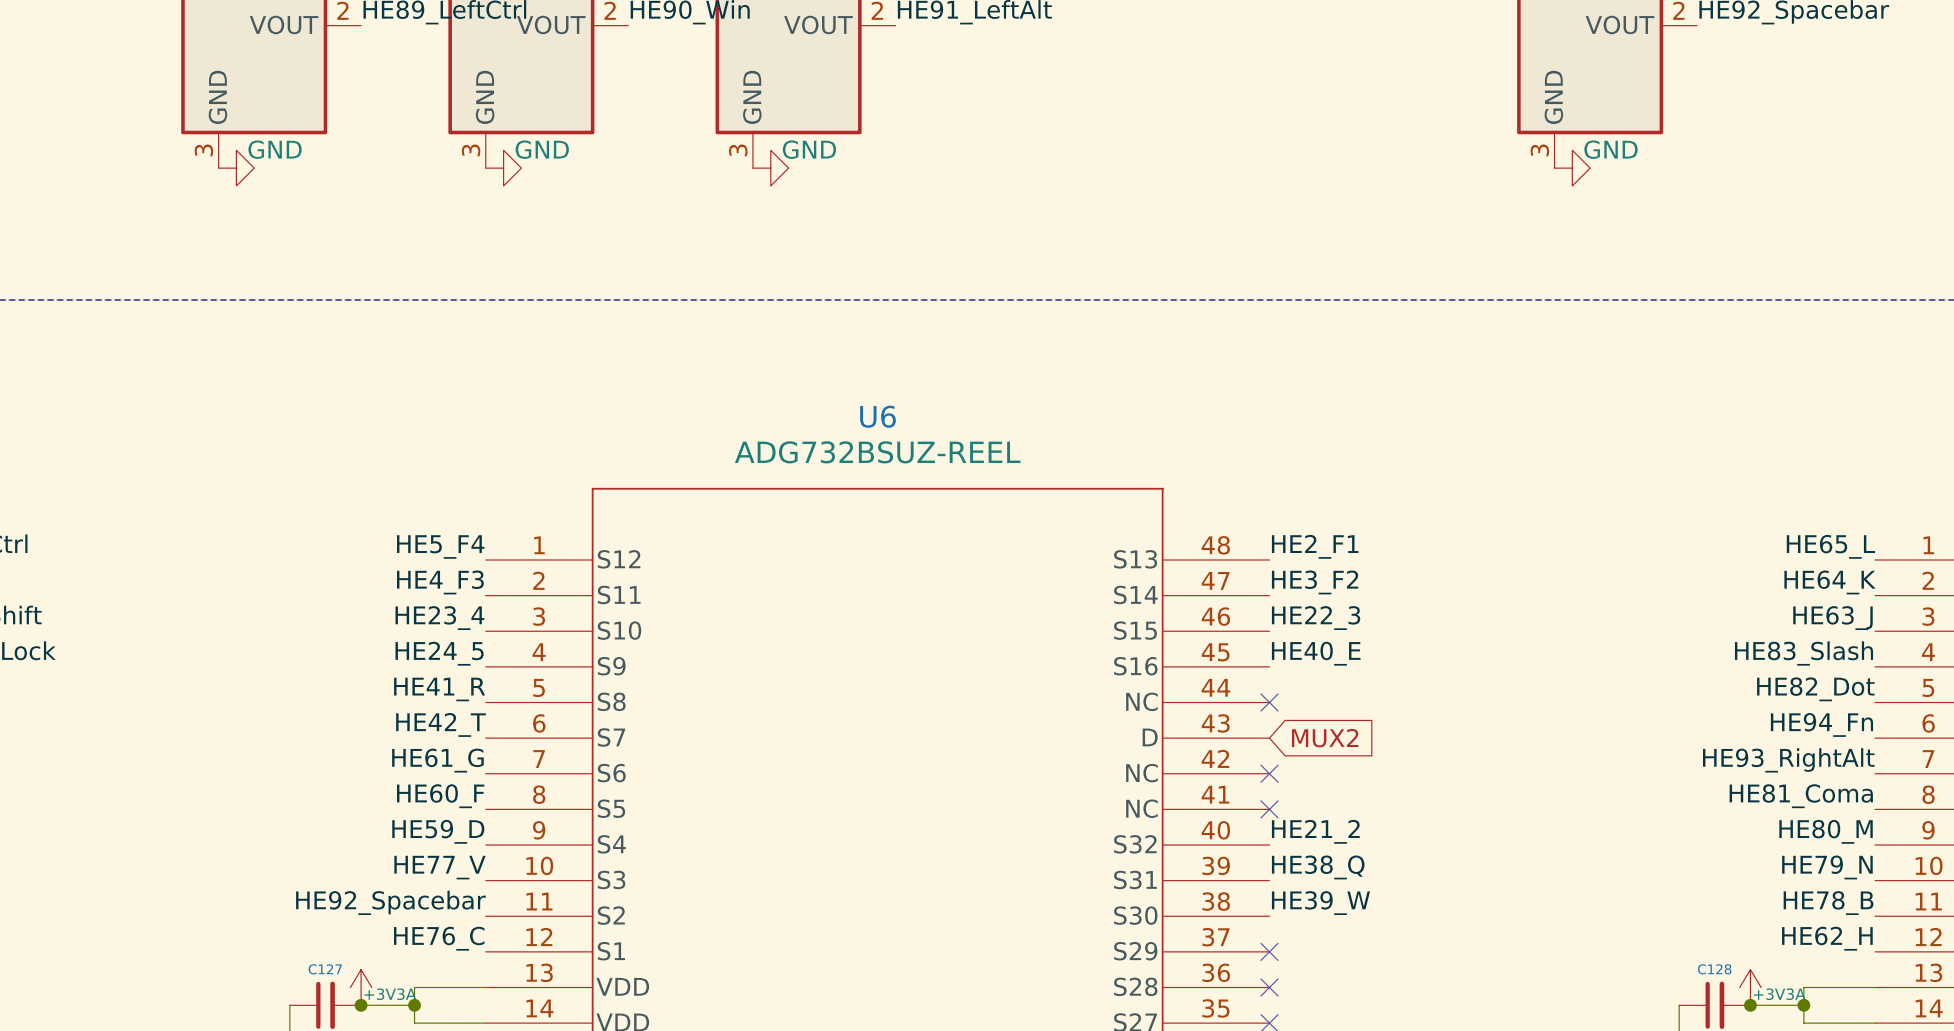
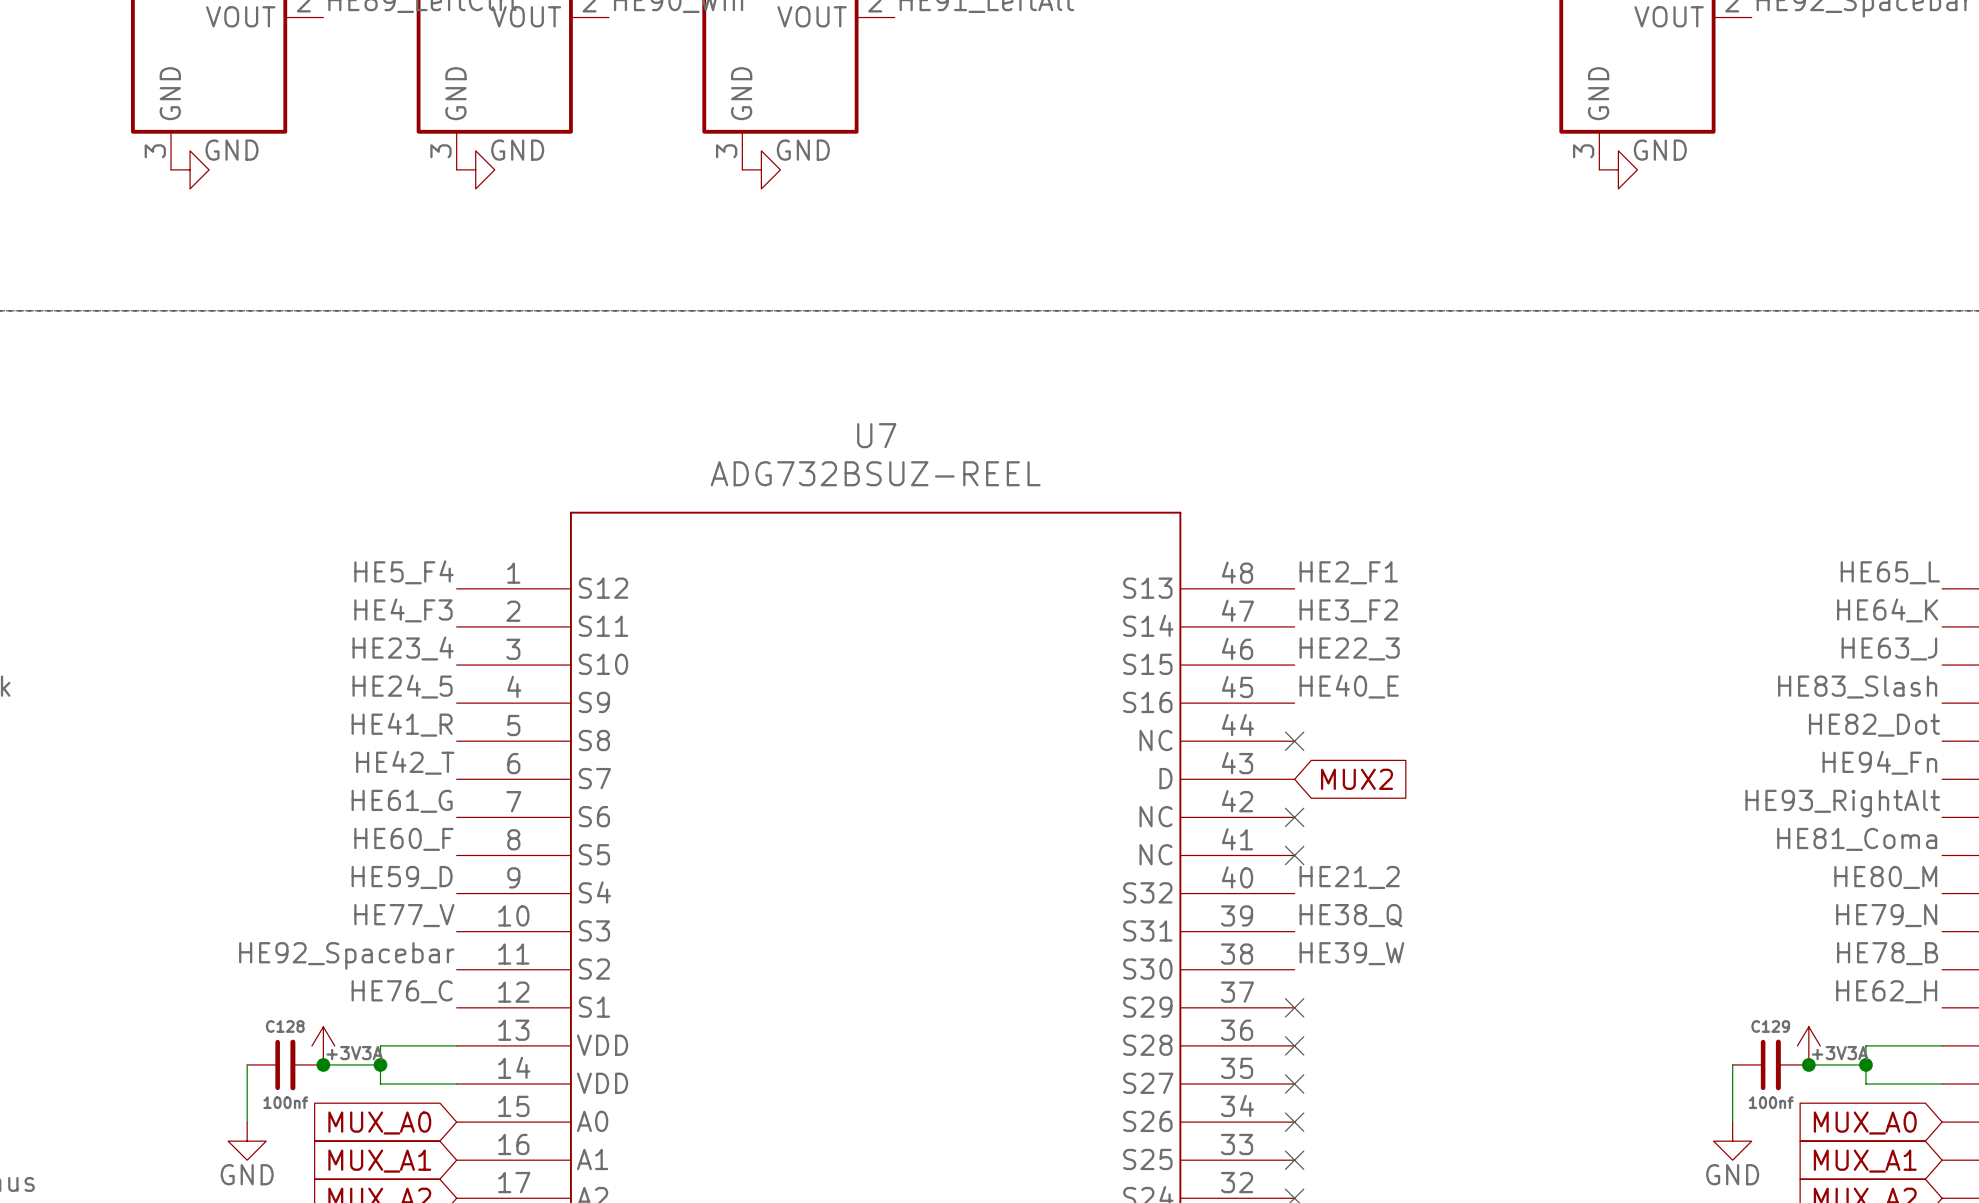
U6 name: U6 (878, 416) -> U7 (876, 435)
C127 name: C127 (325, 969) -> C128 (285, 1026)
C128 name: C128 (1714, 969) -> C129 (1770, 1026)

